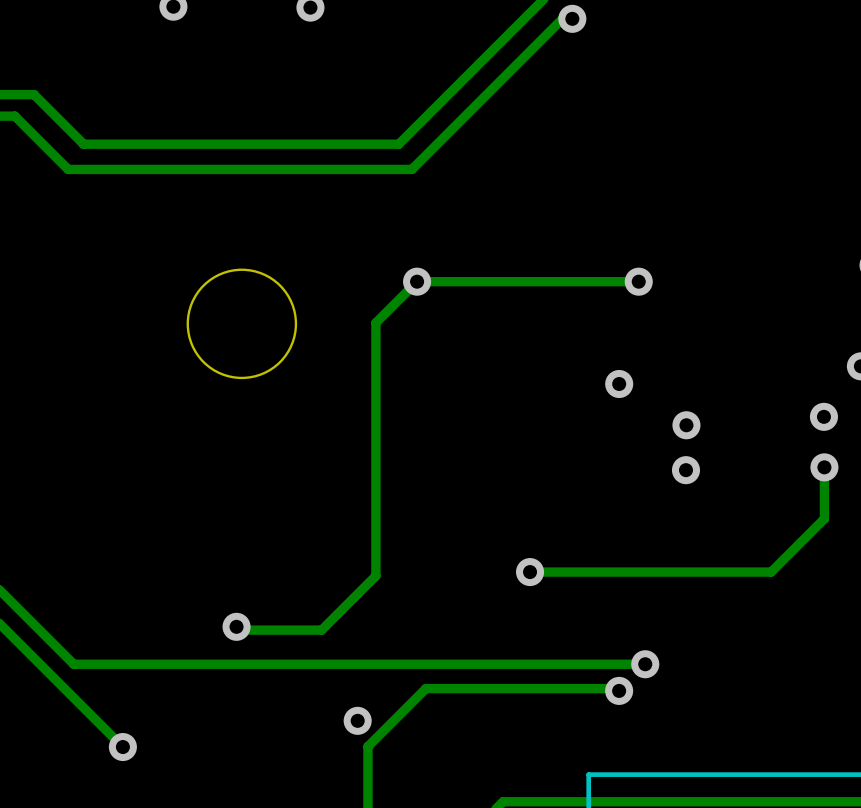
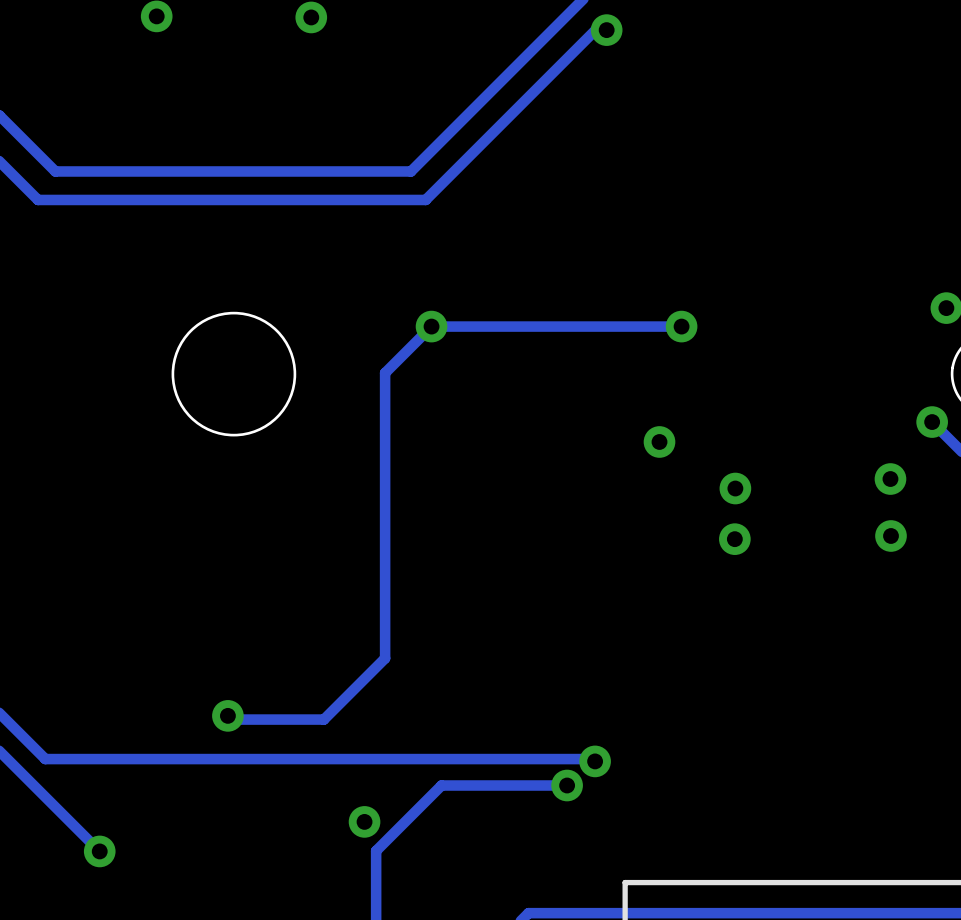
track: (824, 467) (824, 518) (771, 572) (530, 572) -> none
via: (530, 572) -> none
track: (645, 664) (73, 664) -> (595, 761) (592, 759) (44, 758)
via: (645, 664) -> none
via: none -> (595, 761)
track: (537, 688) (616, 688) (619, 690) -> none
via: none -> (567, 785)
via: (619, 690) -> none

